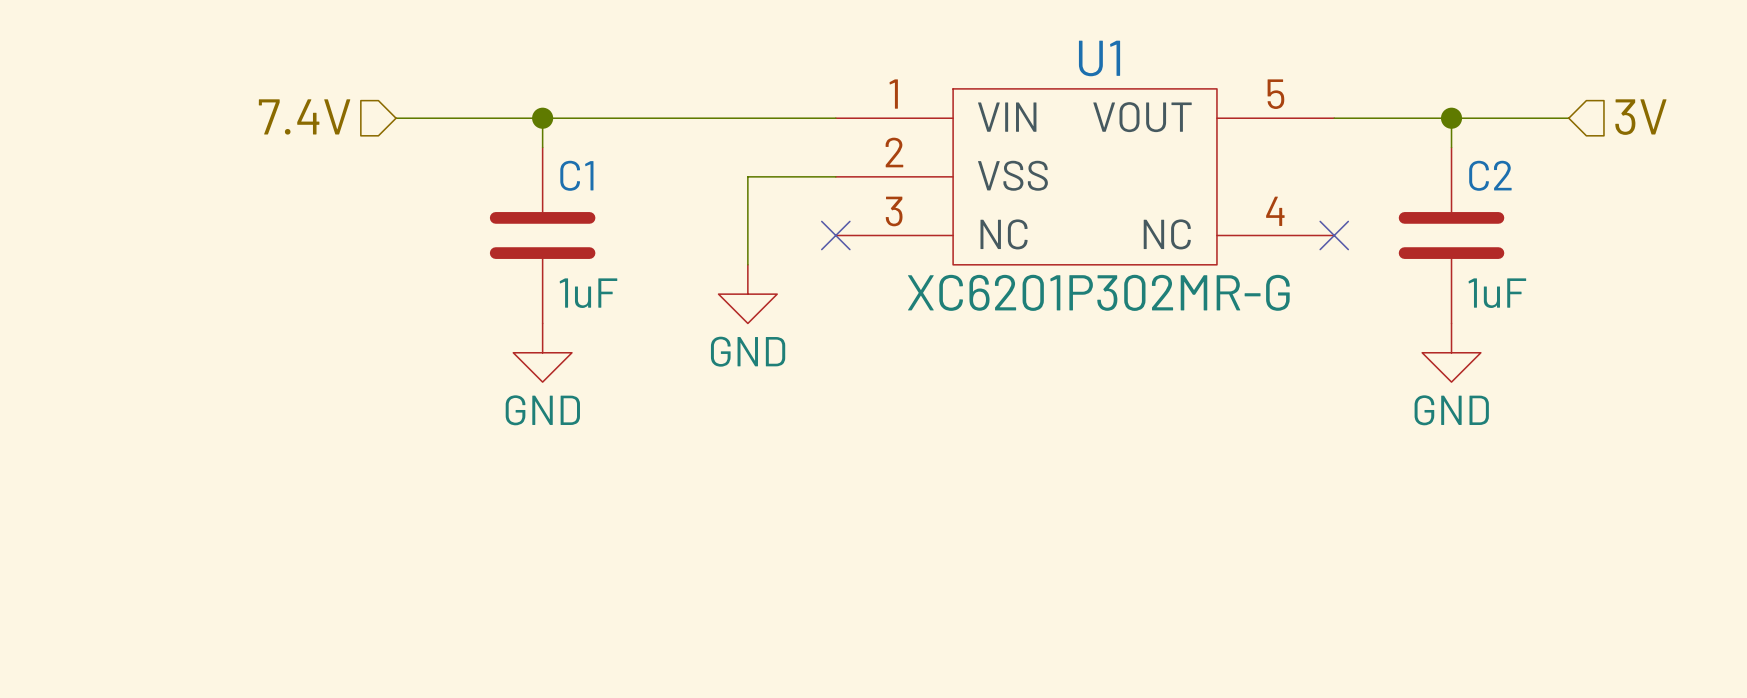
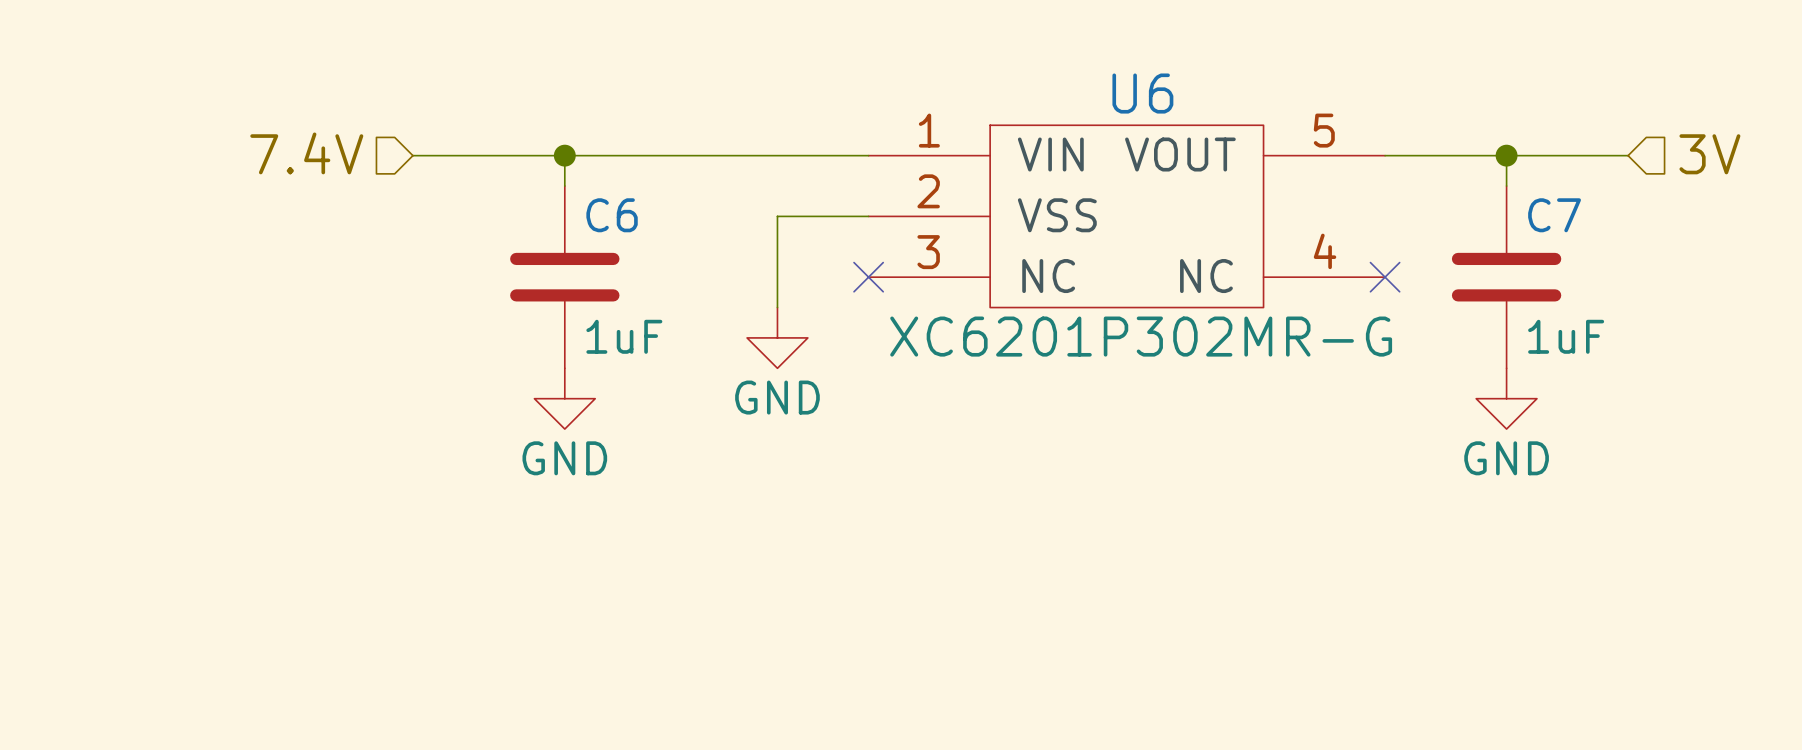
U1 name: U1 (1099, 58) -> U6 (1142, 93)
C1 name: C1 (576, 175) -> C6 (612, 215)
C2 name: C2 (1490, 175) -> C7 (1554, 215)

